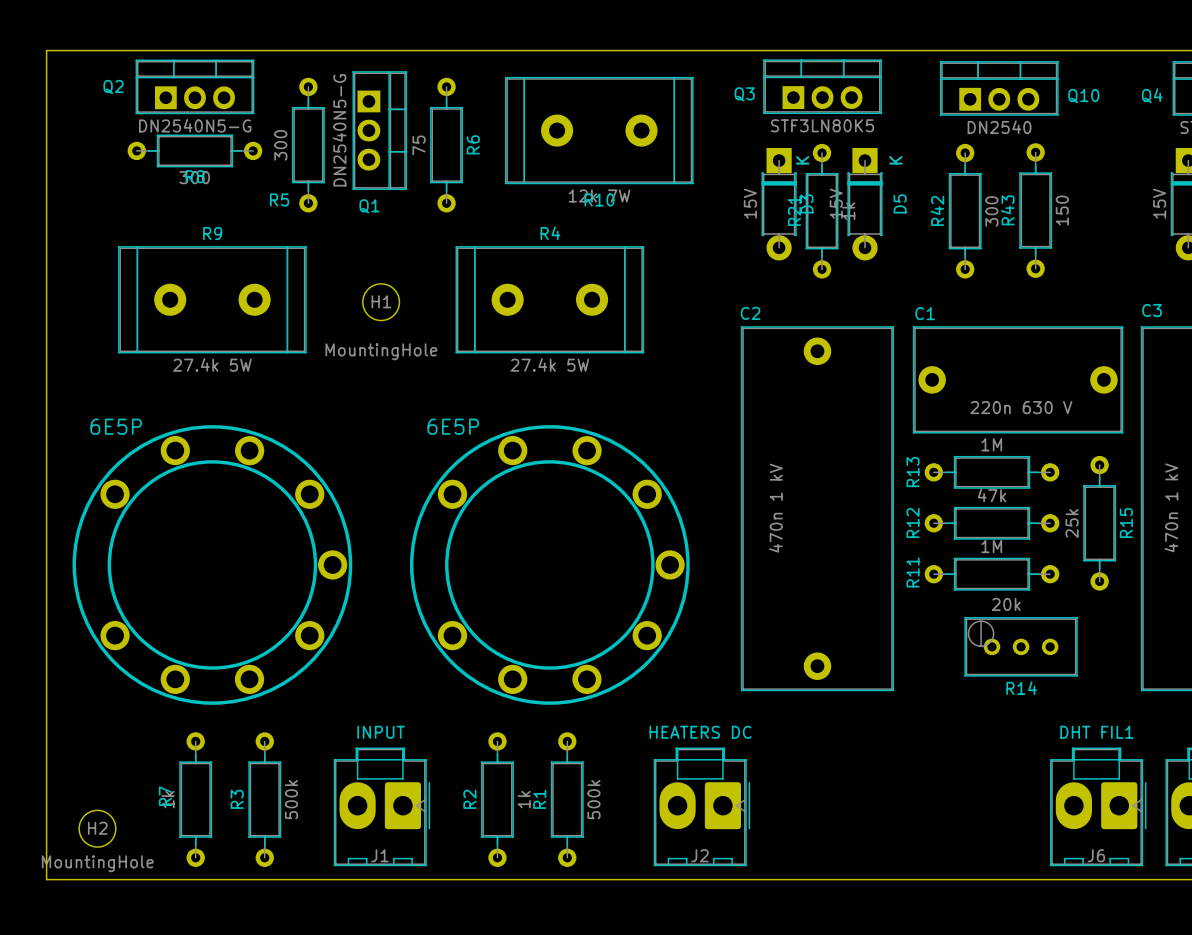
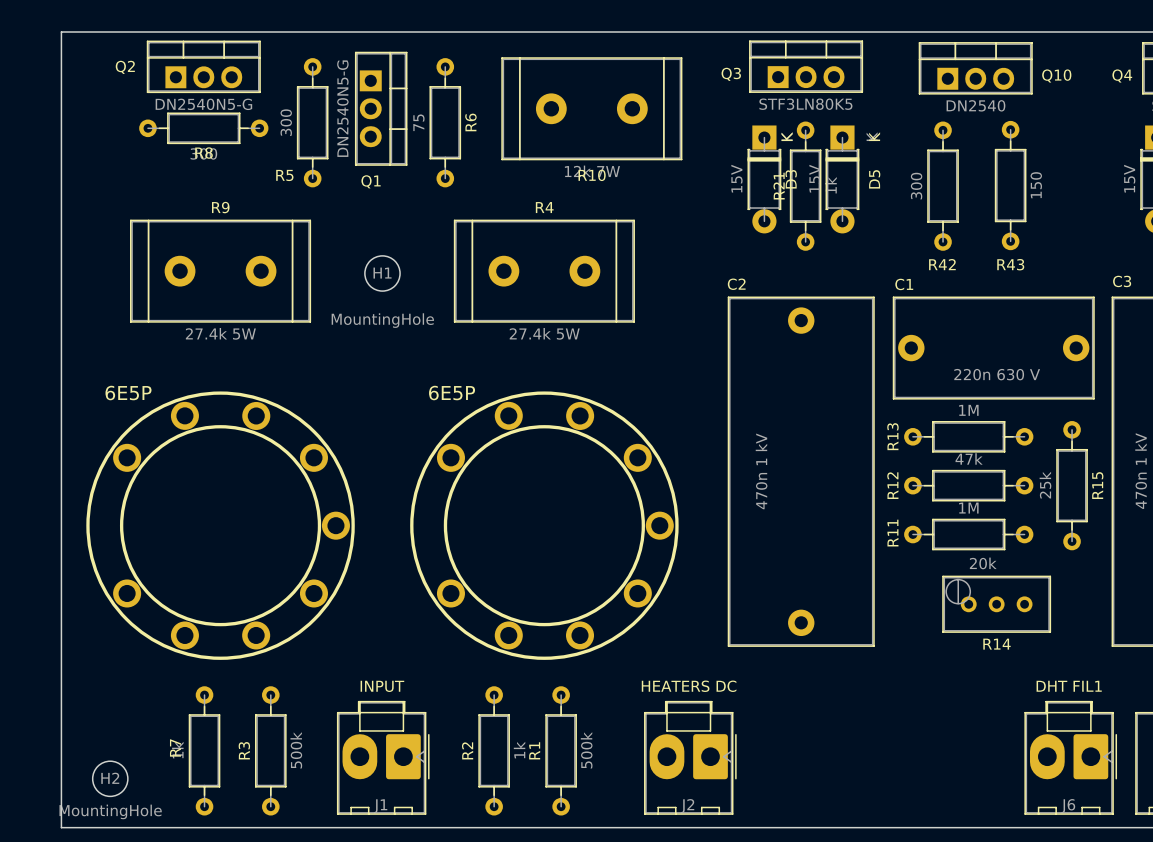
D5 footprint: [847, 147, 883, 261] -> [825, 125, 860, 234]
R42 name rotation: 0° (937, 210) -> 90° clockwise (942, 264)
R42 name position: R42 (937, 210) -> R42 (942, 264)
R43 name rotation: 0° (1007, 210) -> 90° clockwise (1010, 264)
R43 name position: R43 (1007, 210) -> R43 (1010, 264)
R42 value position: 300 (991, 211) -> 300 (916, 186)

